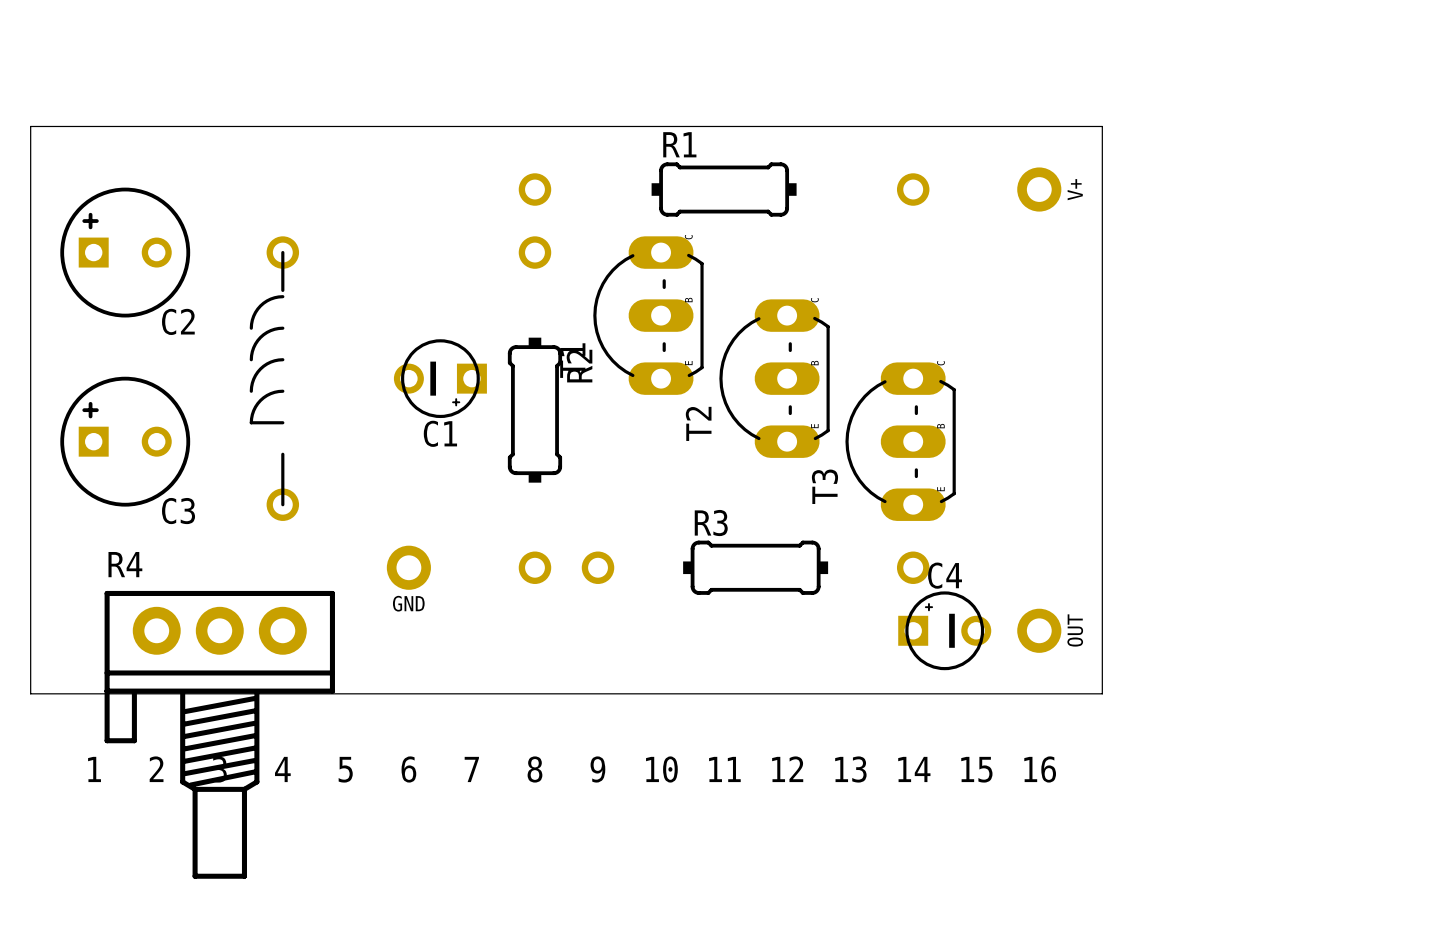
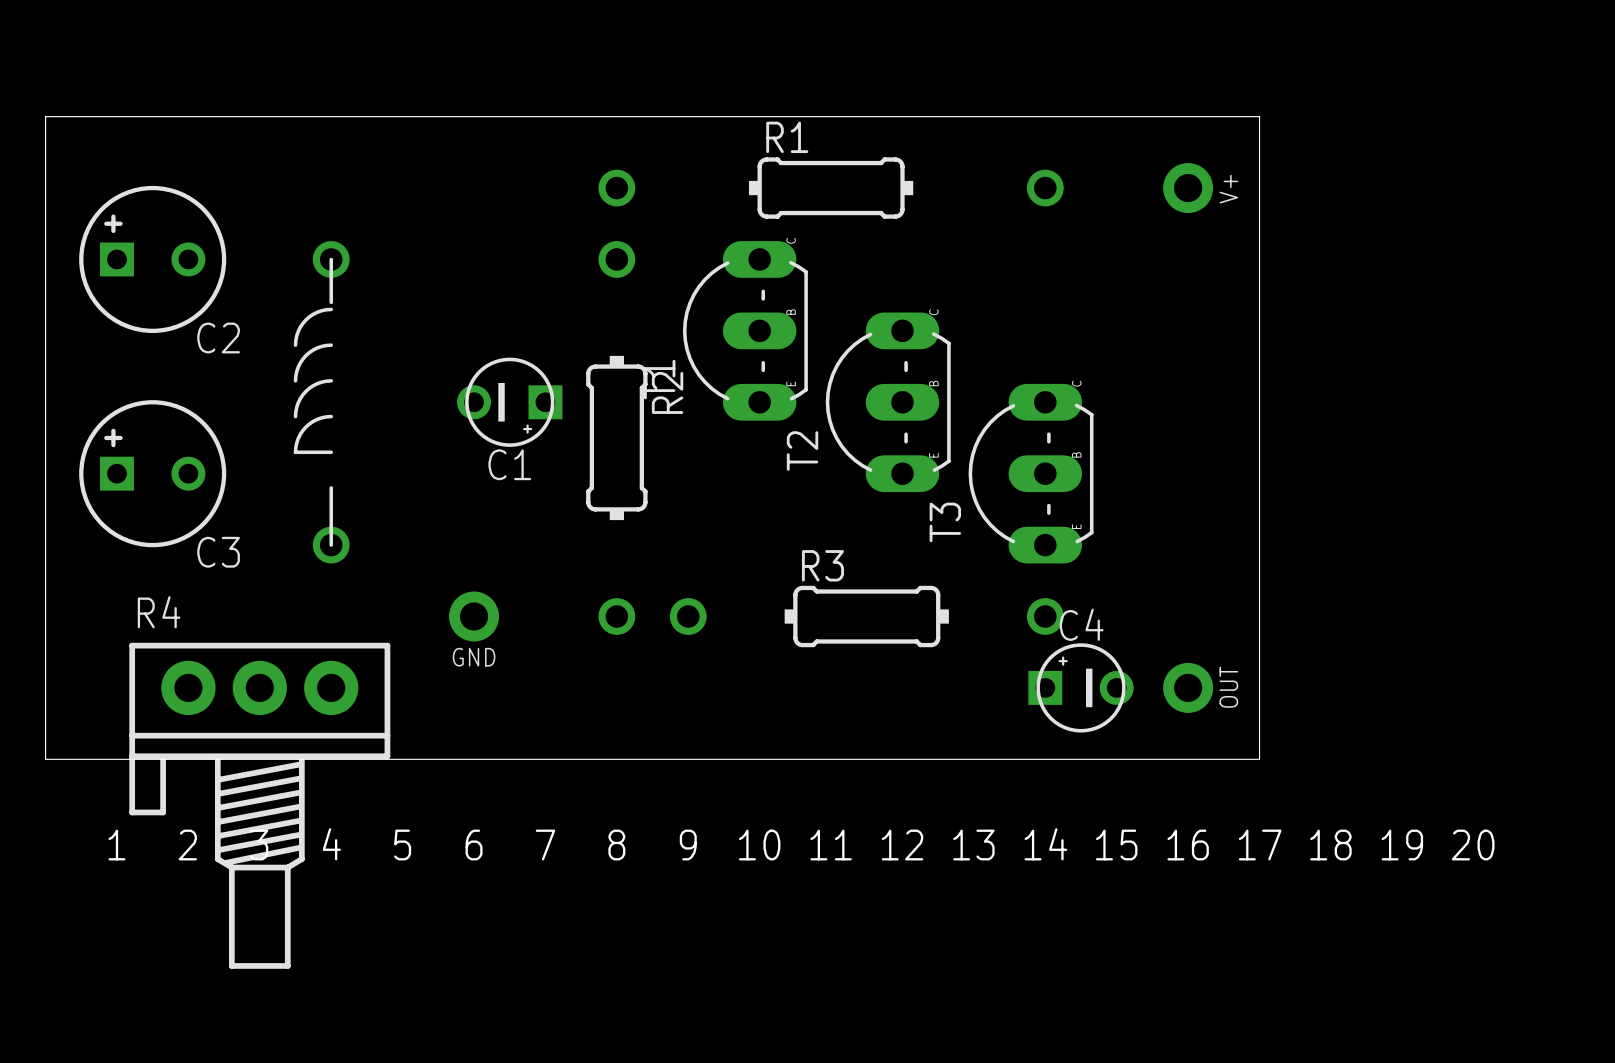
text: none -> 17 (1260, 845)
text: none -> 18 (1330, 845)
text: none -> 19 (1402, 845)
text: none -> 20 (1473, 845)

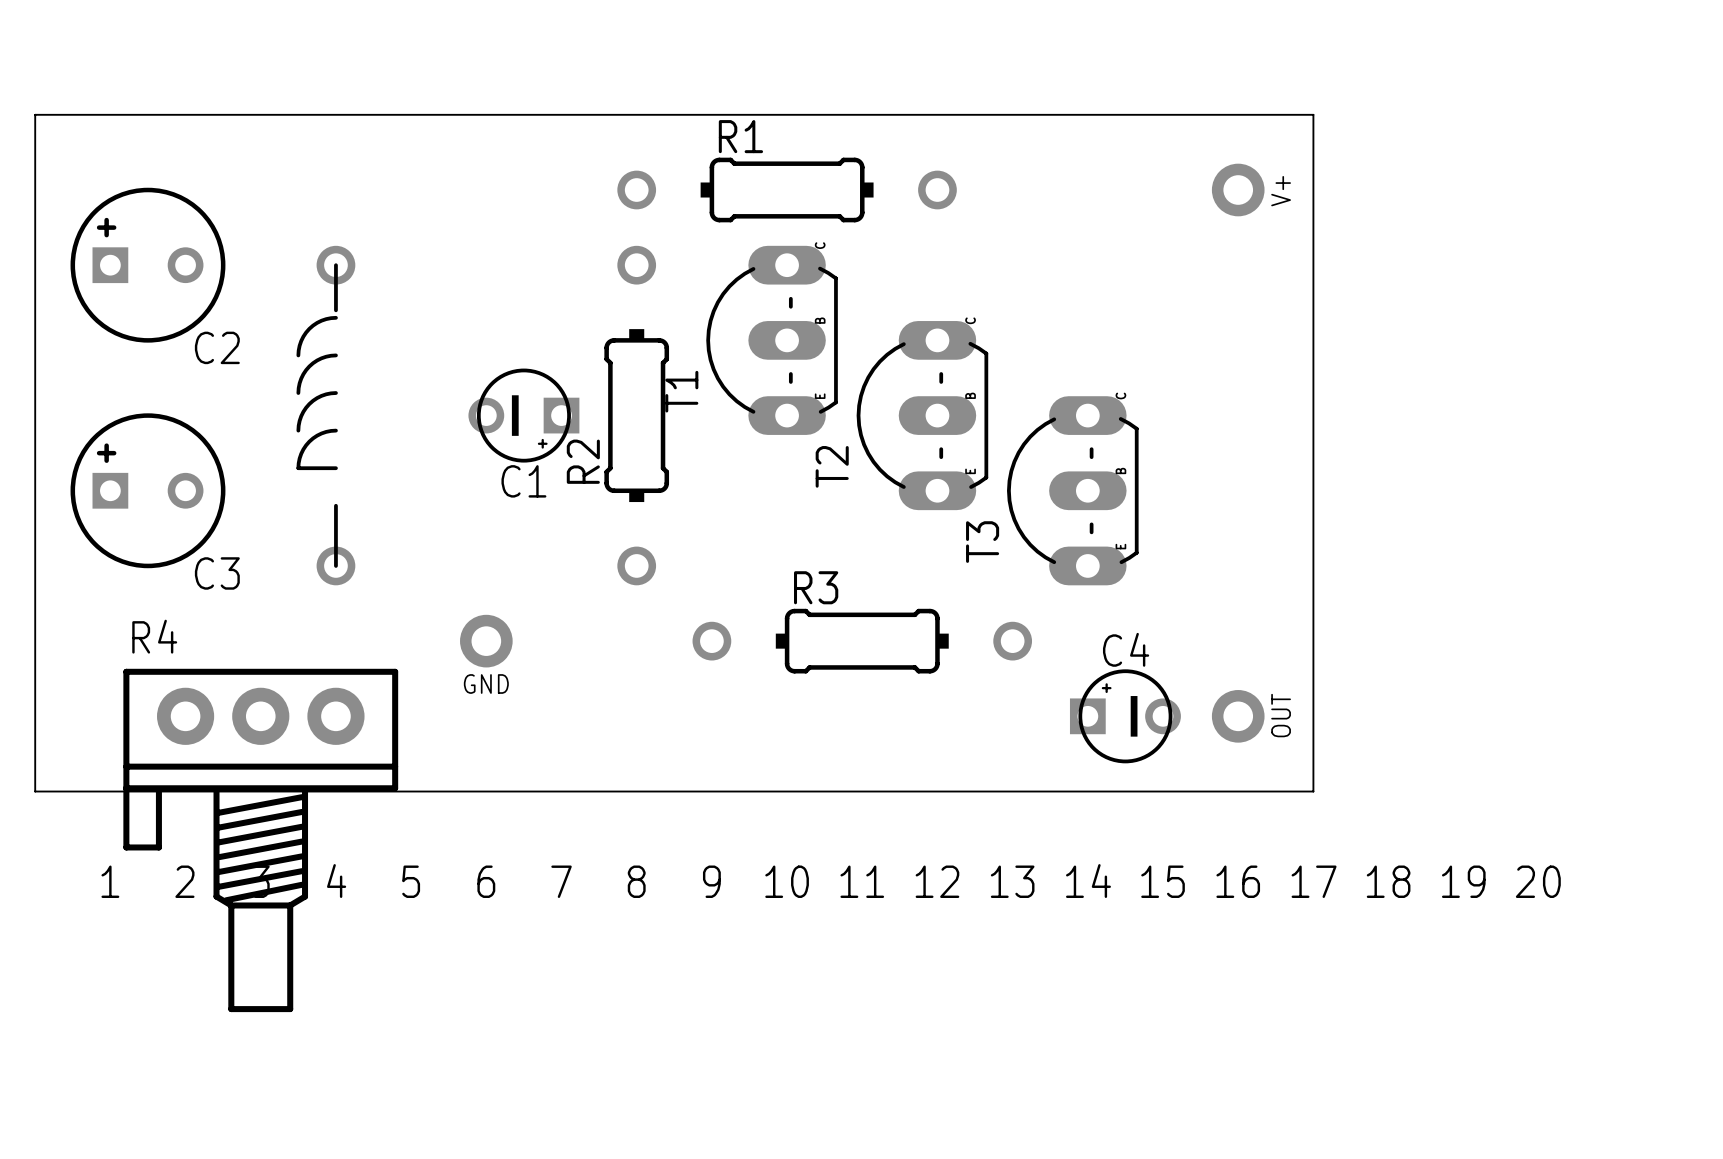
R1 footprint: [598, 157, 1064, 219] -> [617, 157, 957, 223]
R2 footprint: [586, 241, 648, 635] -> [604, 245, 670, 586]
R2 name position: R2 (667, 392) -> R2 (583, 461)
R3 footprint: [669, 585, 1064, 648] -> [692, 608, 1033, 674]

